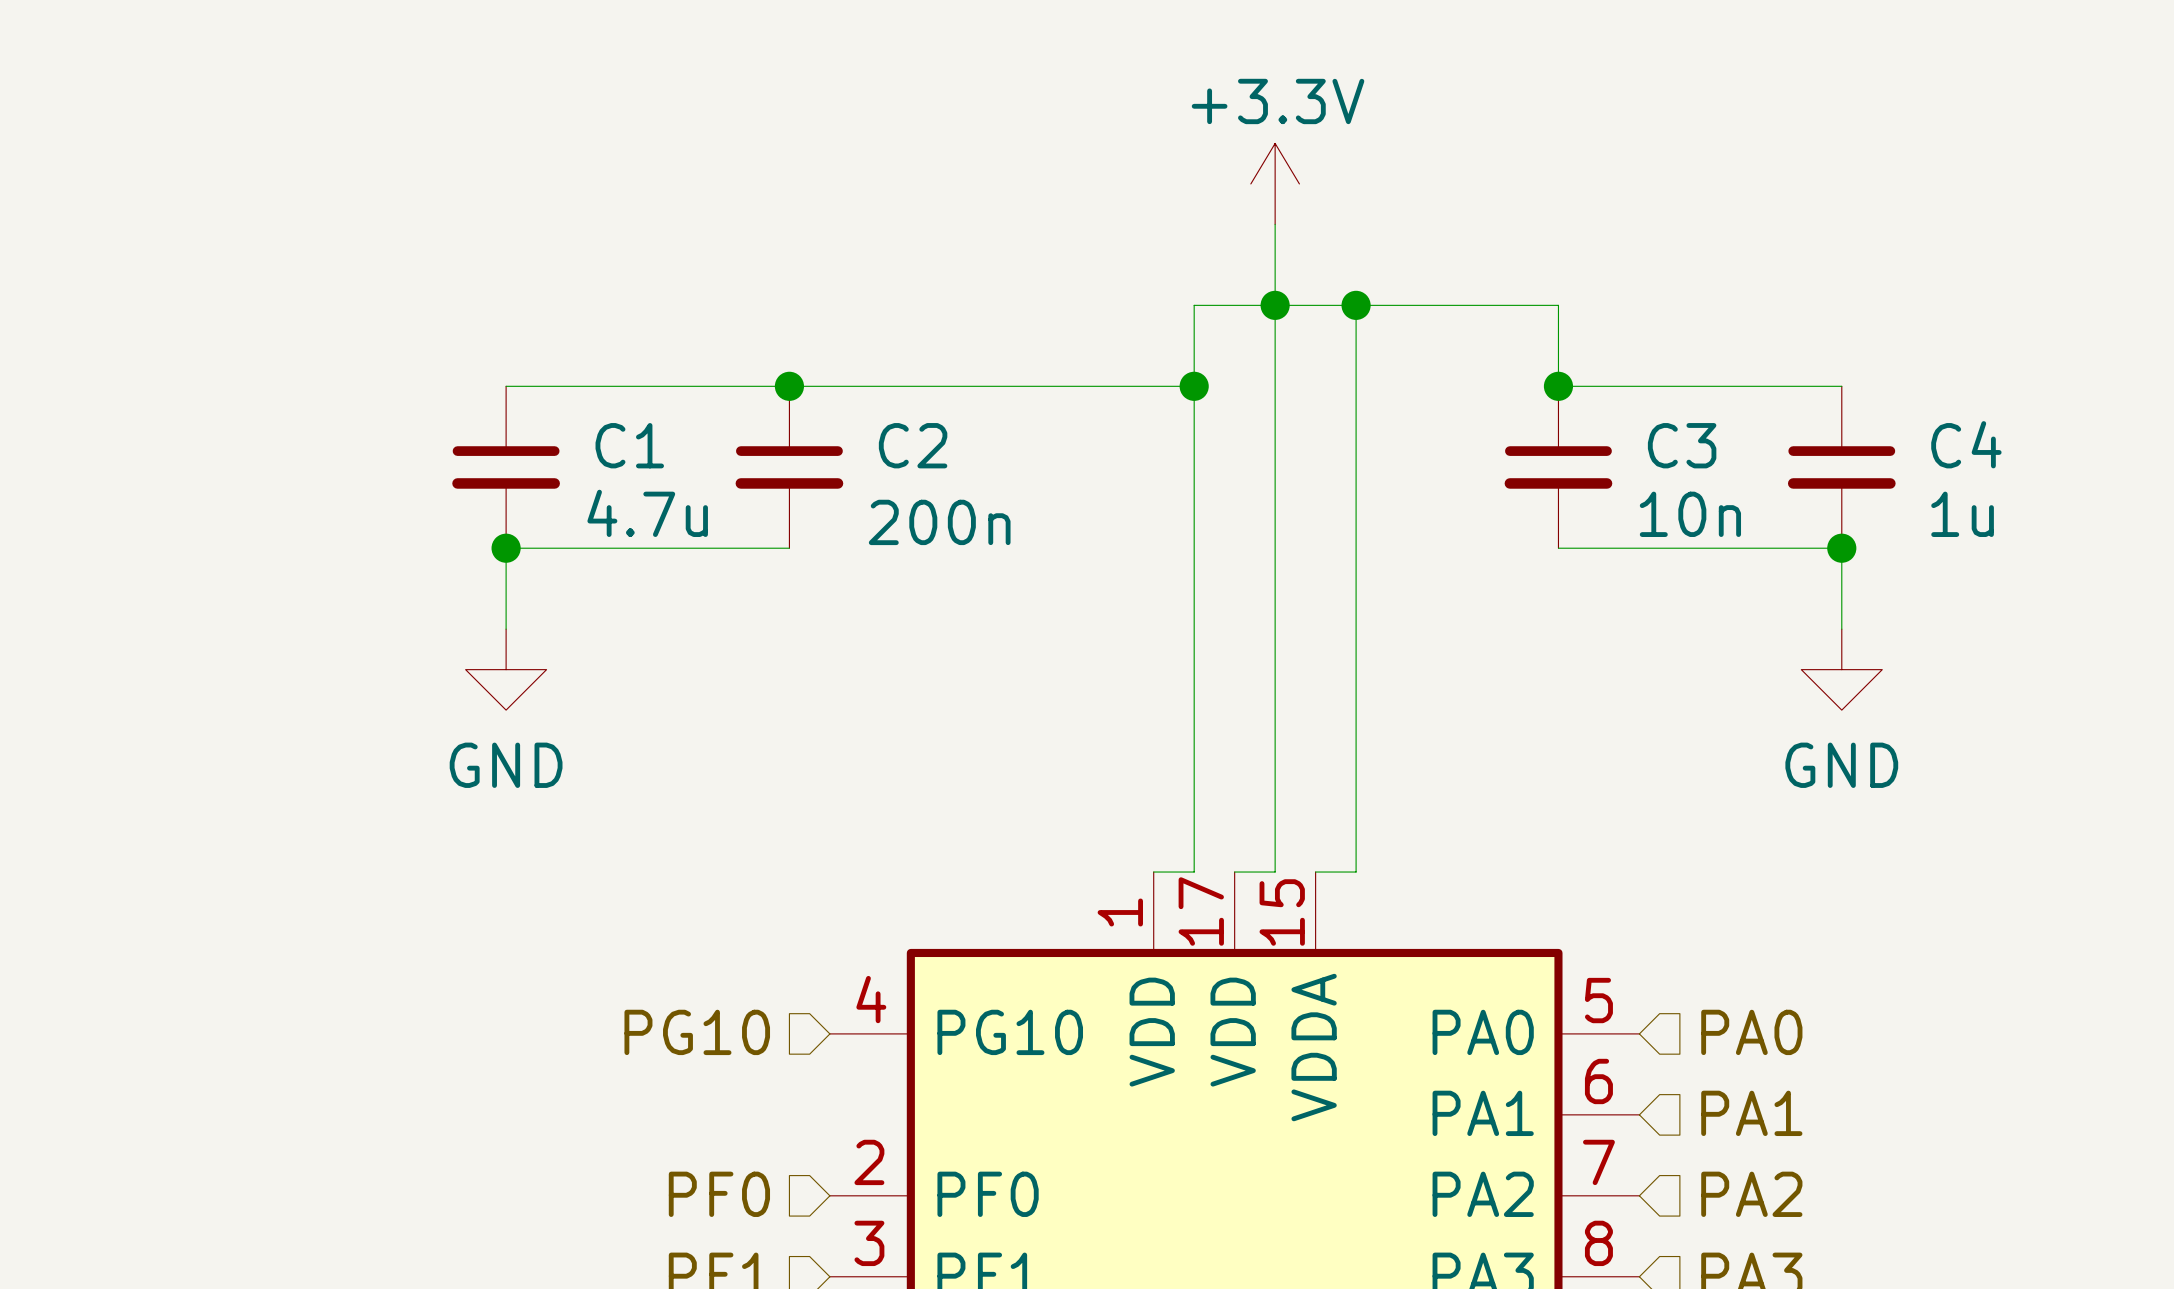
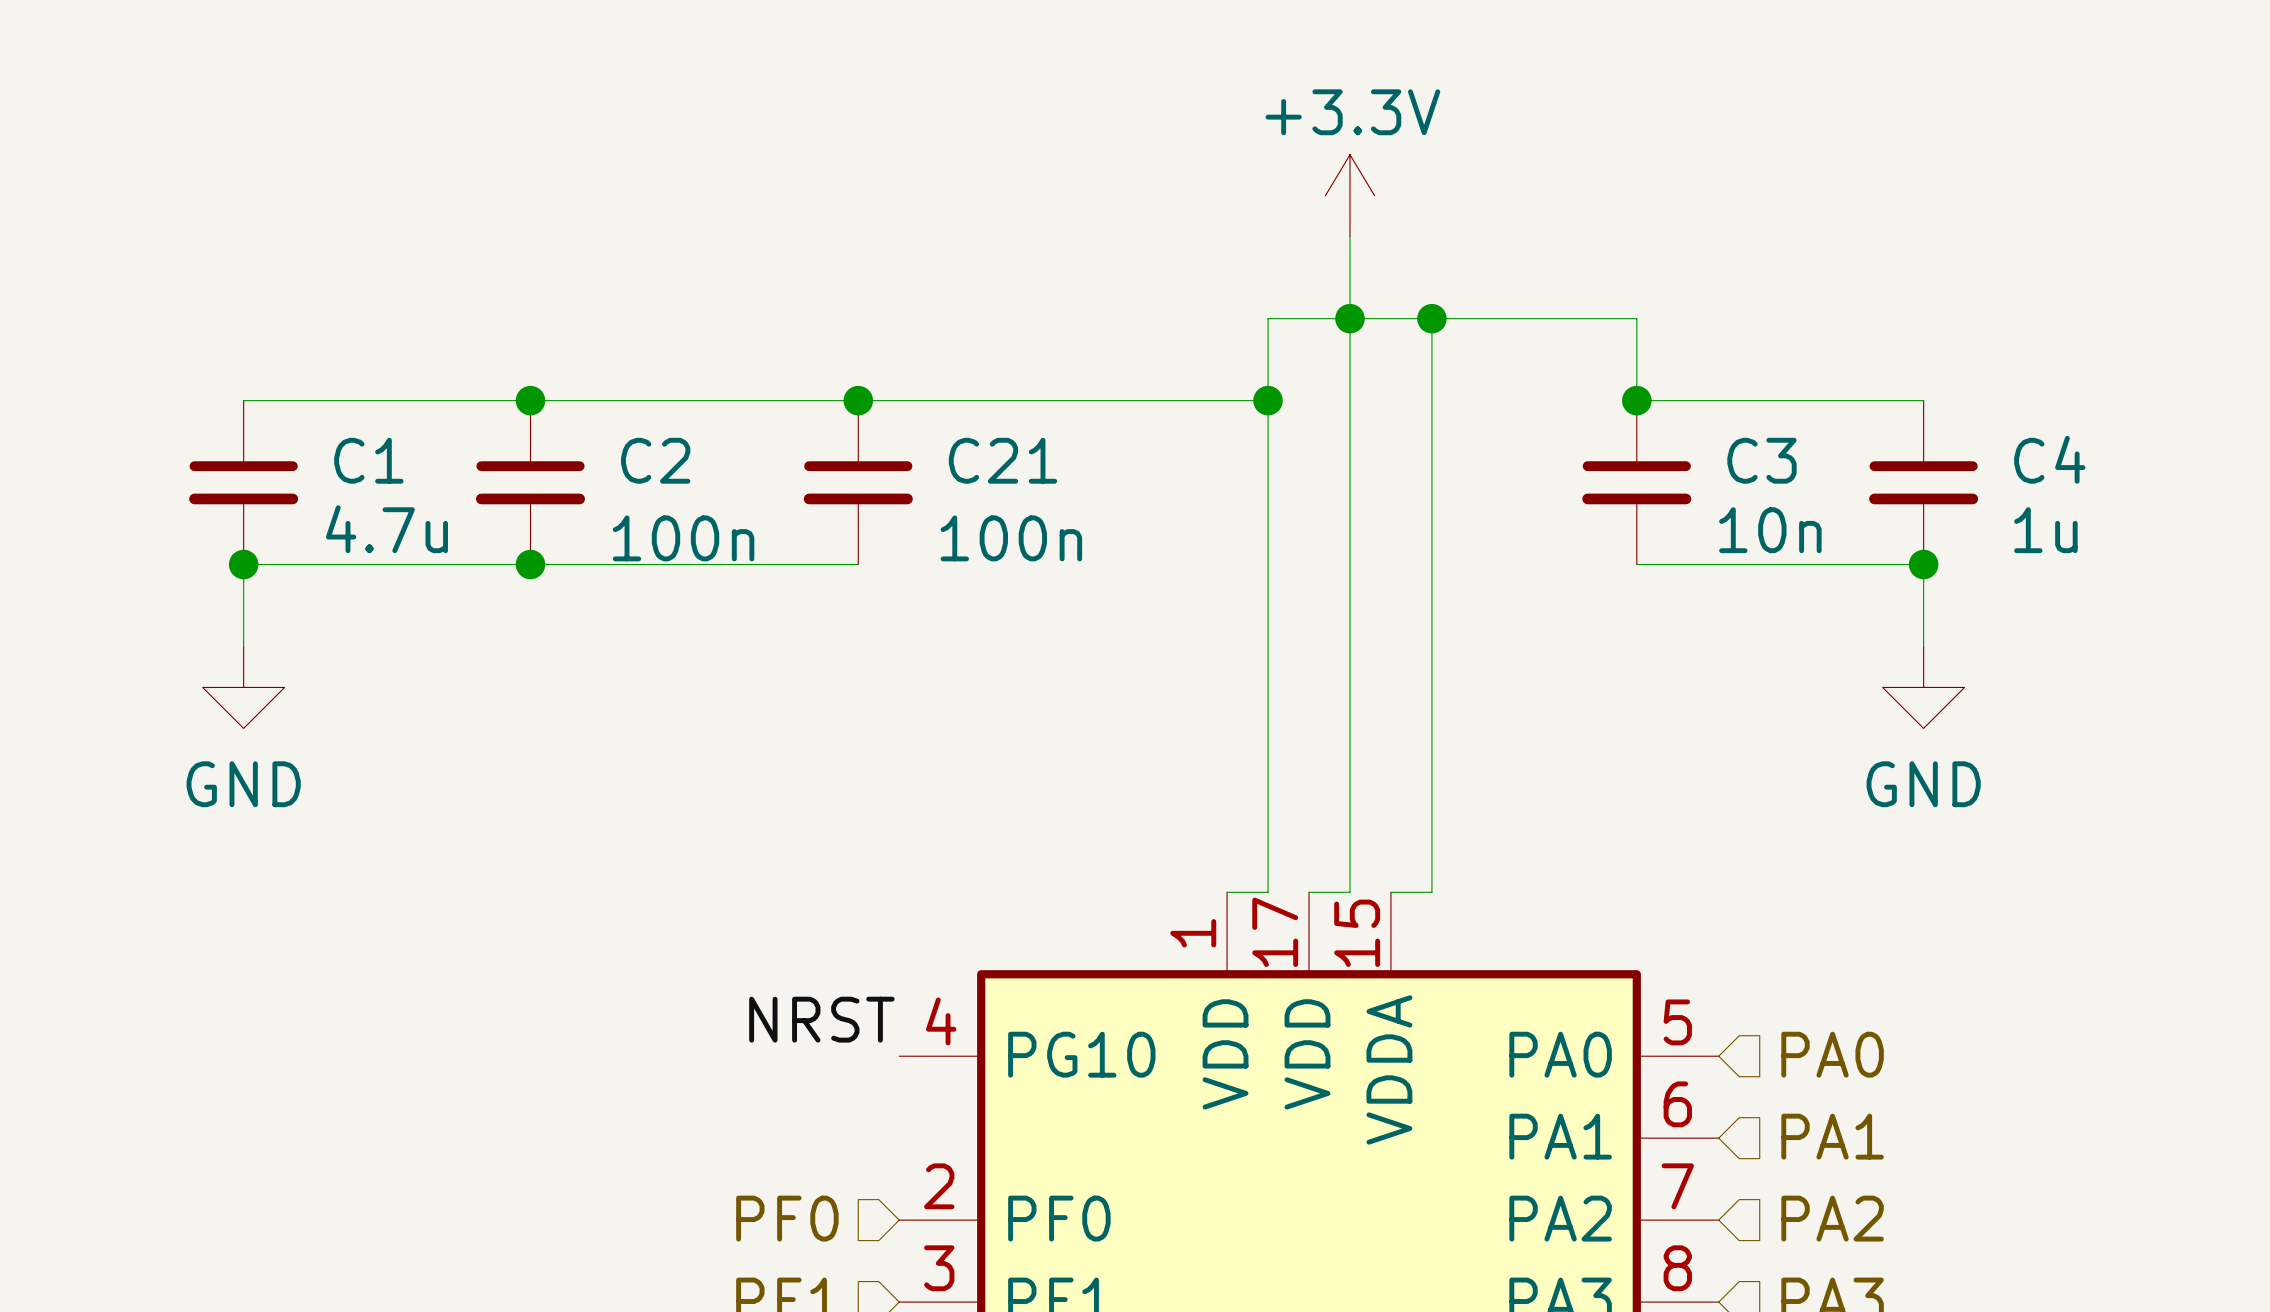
wire: none -> (243, 400) (571, 400)
junction: none -> (530, 400)
C2 name: C2 (913, 445) -> C21 (1002, 460)
C2: none -> 100n (530, 482)
C1 position: (506, 467) -> (243, 482)
C2 value: 200n (939, 522) -> 100n (1011, 538)
junction: none -> (243, 564)
wire: (506, 548) (506, 629) -> (571, 564) (243, 564) (243, 646)
junction position: (506, 548) -> (530, 564)
power symbol position: GND (506, 669) -> GND (243, 687)
label: none -> NRST (821, 1019)
hierarchical label: PG10 (697, 1032) -> none

